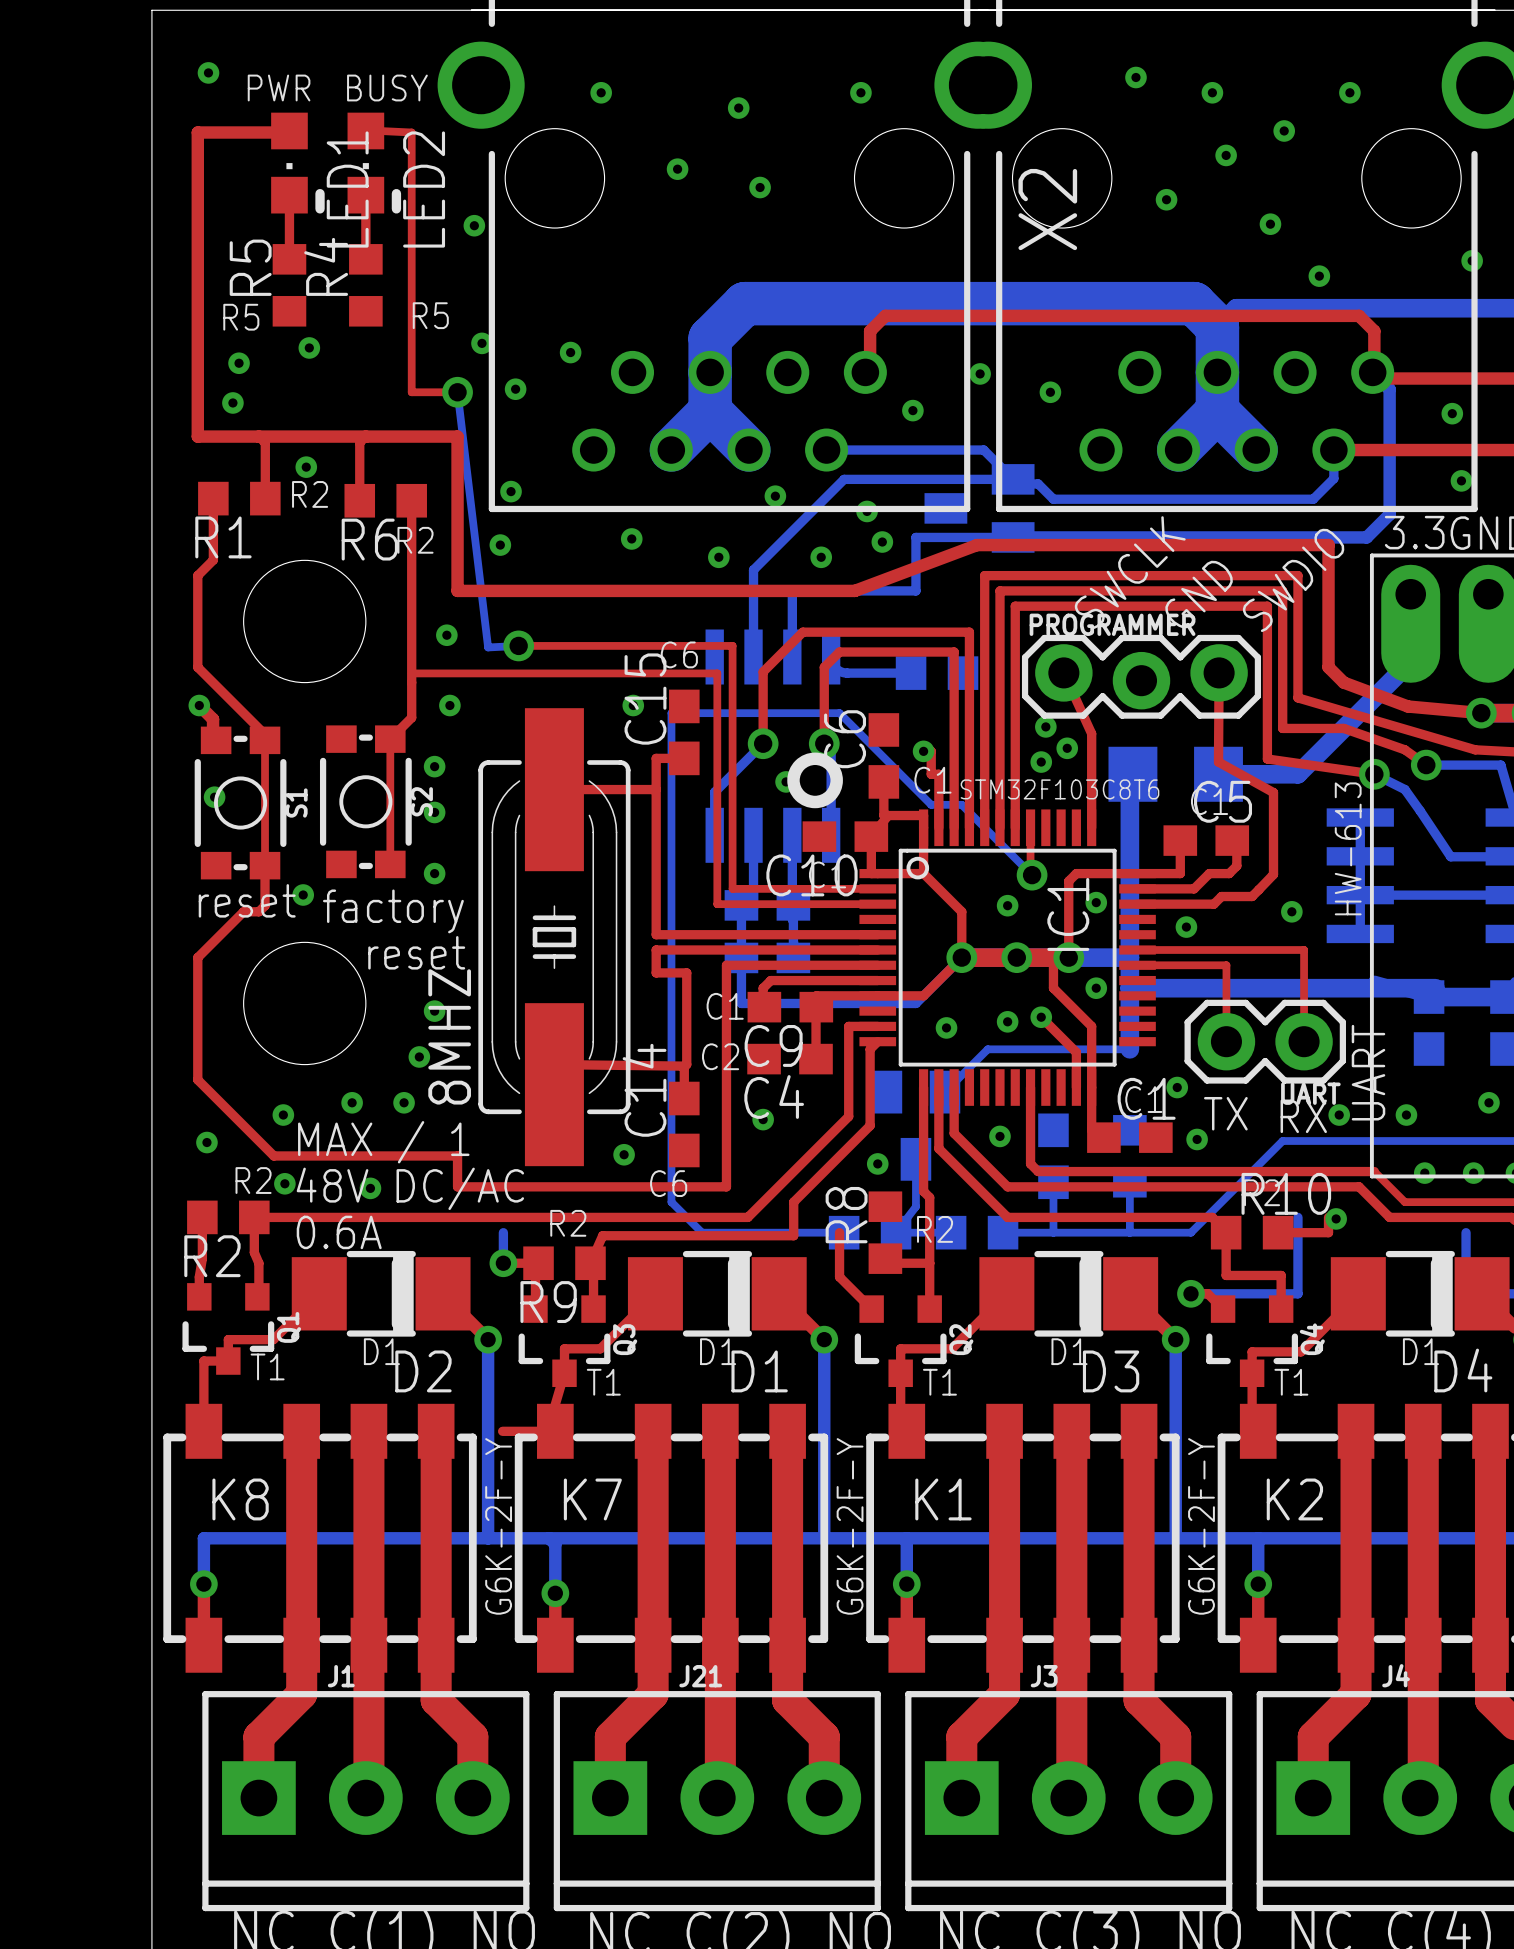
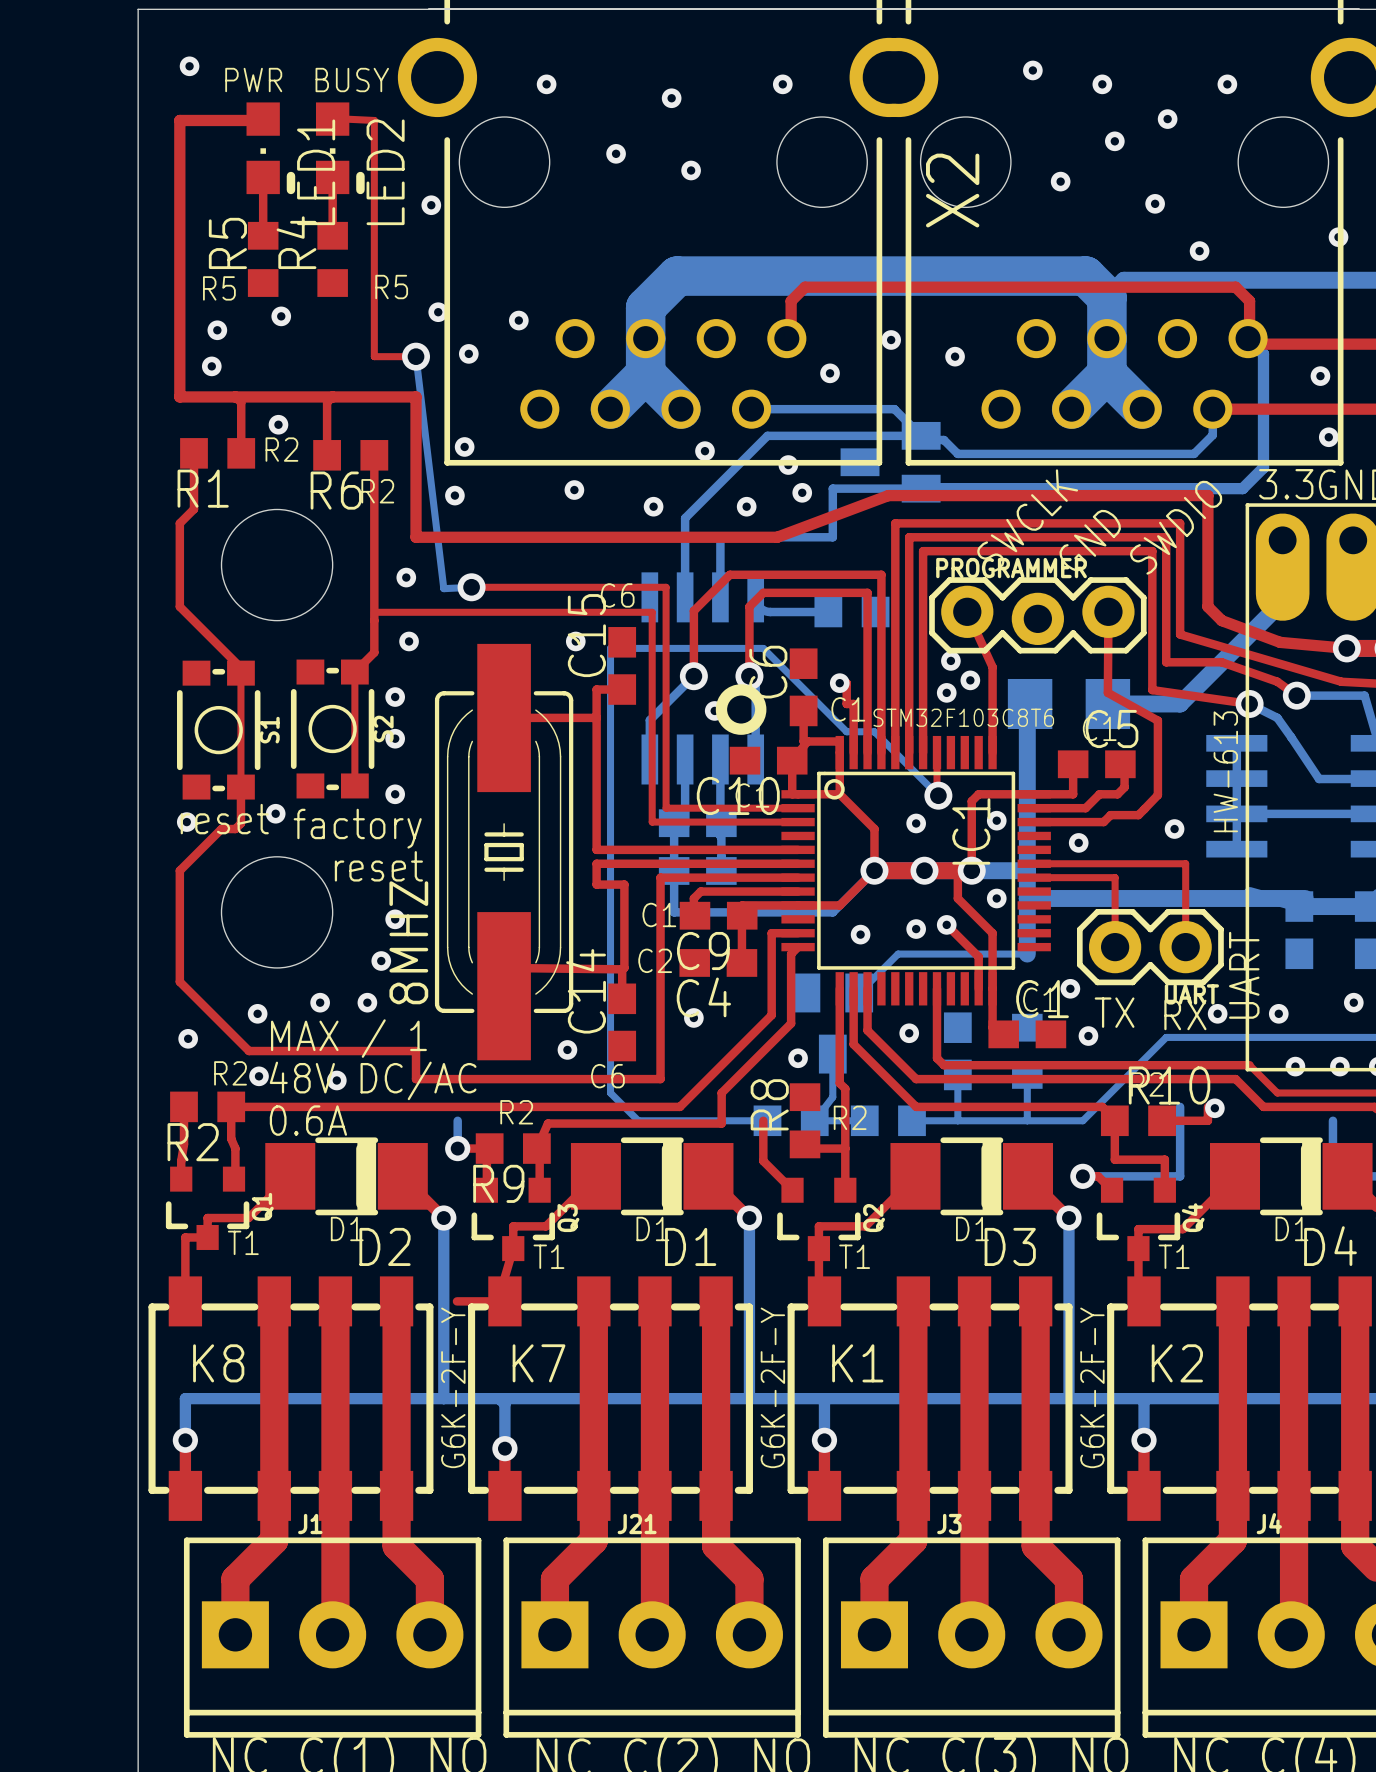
top track: (199, 705) (213, 719) (213, 728) -> none
via: (199, 705) -> none
via: (214, 797) -> none
via: none -> (186, 822)

